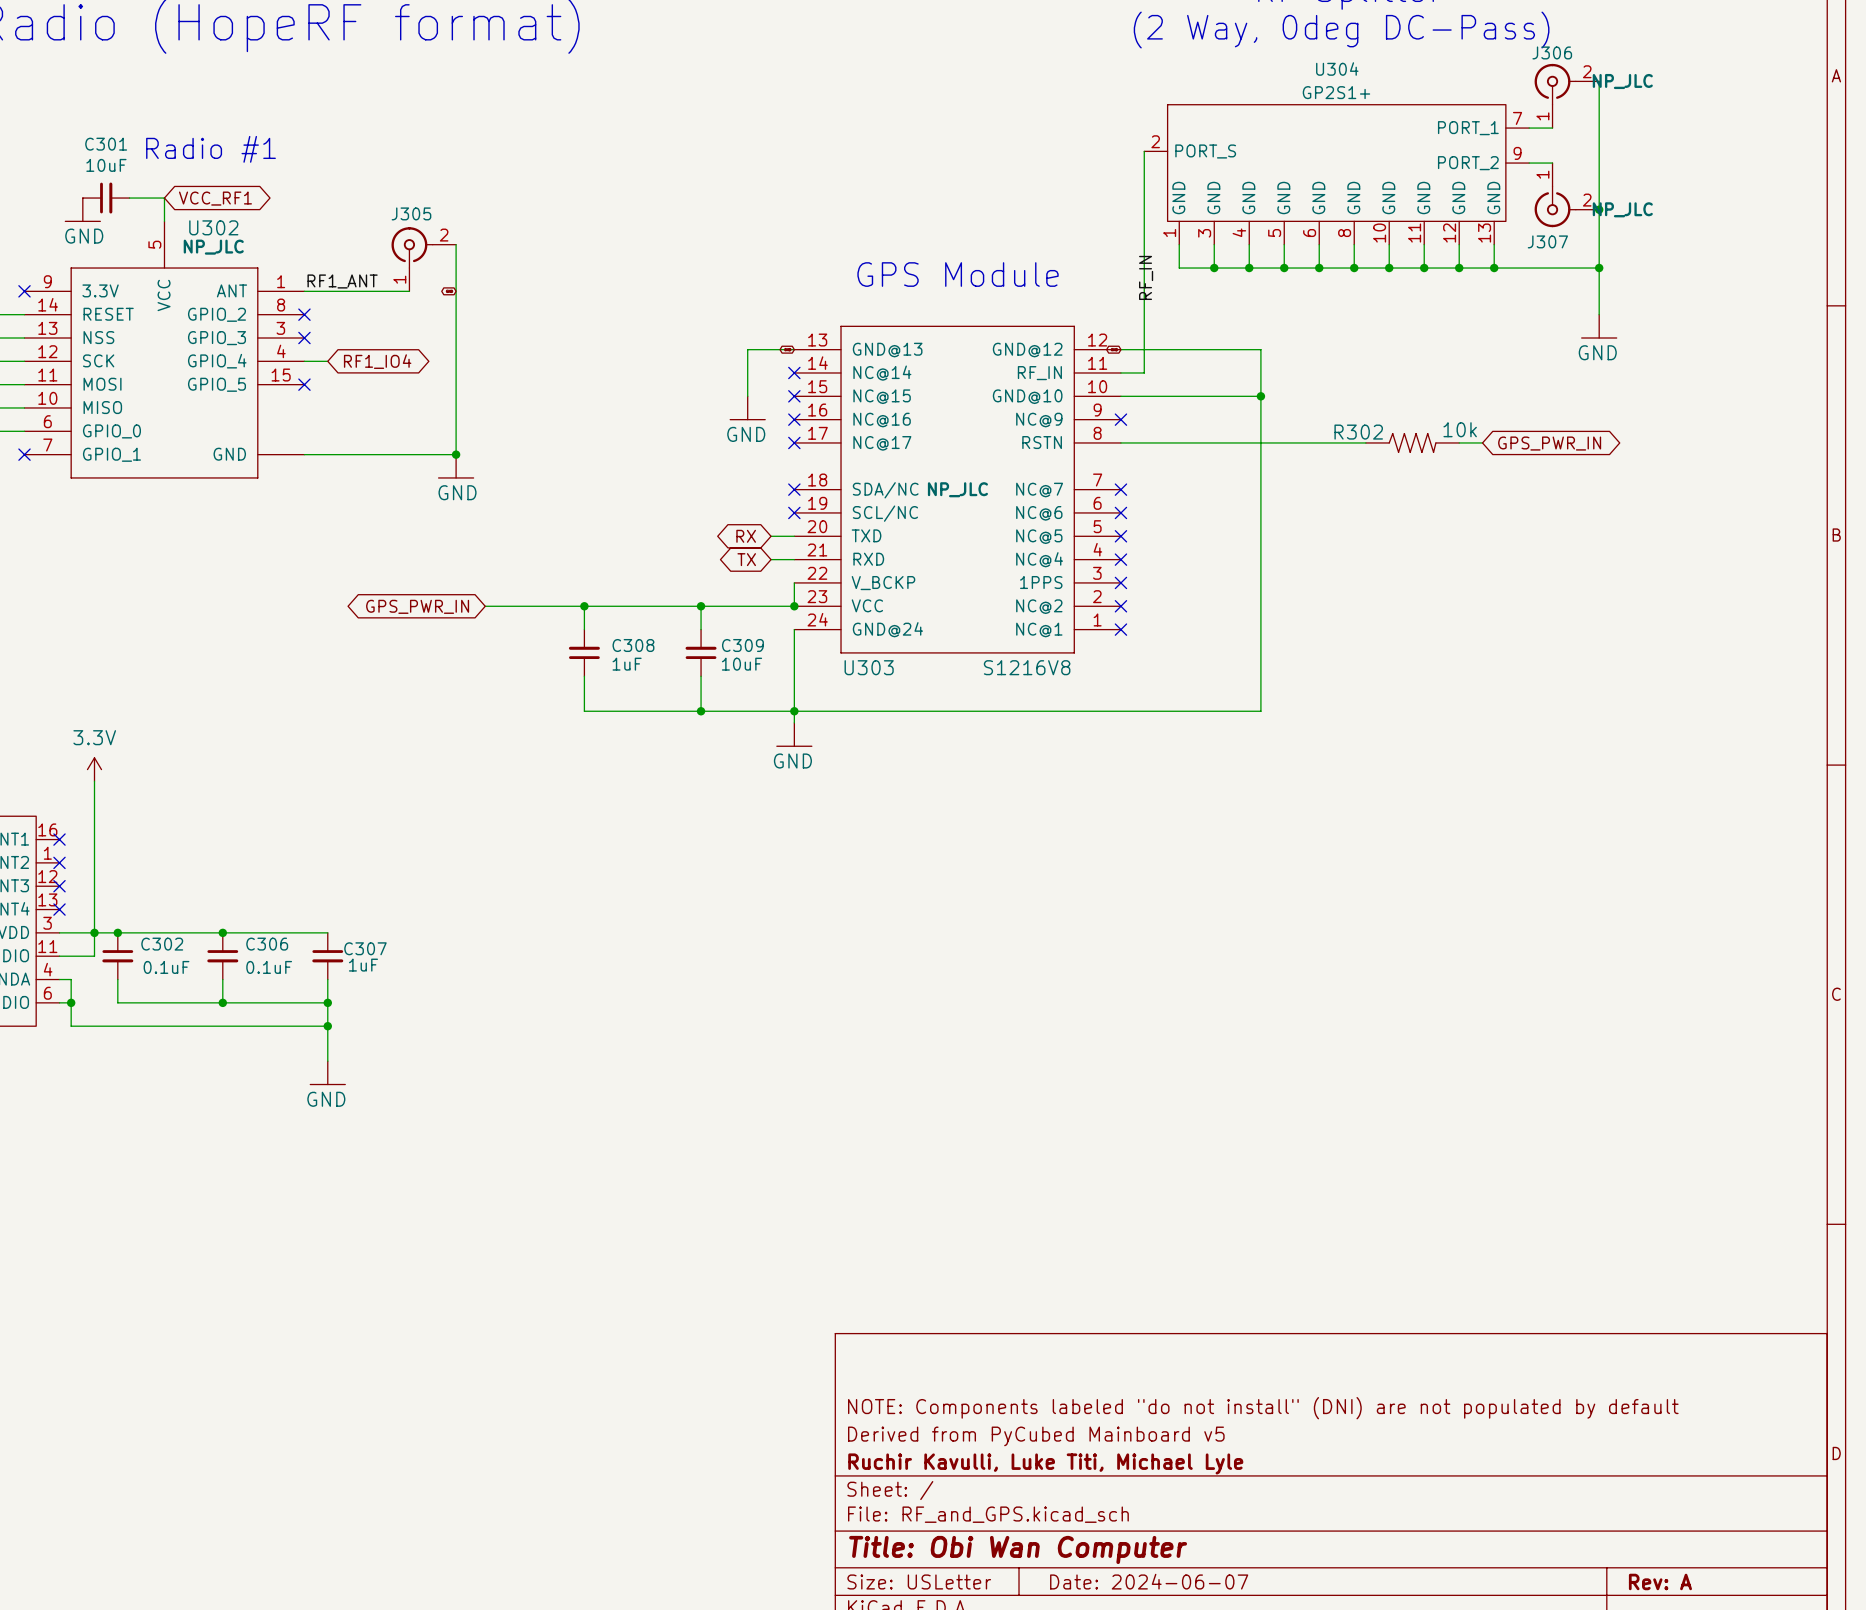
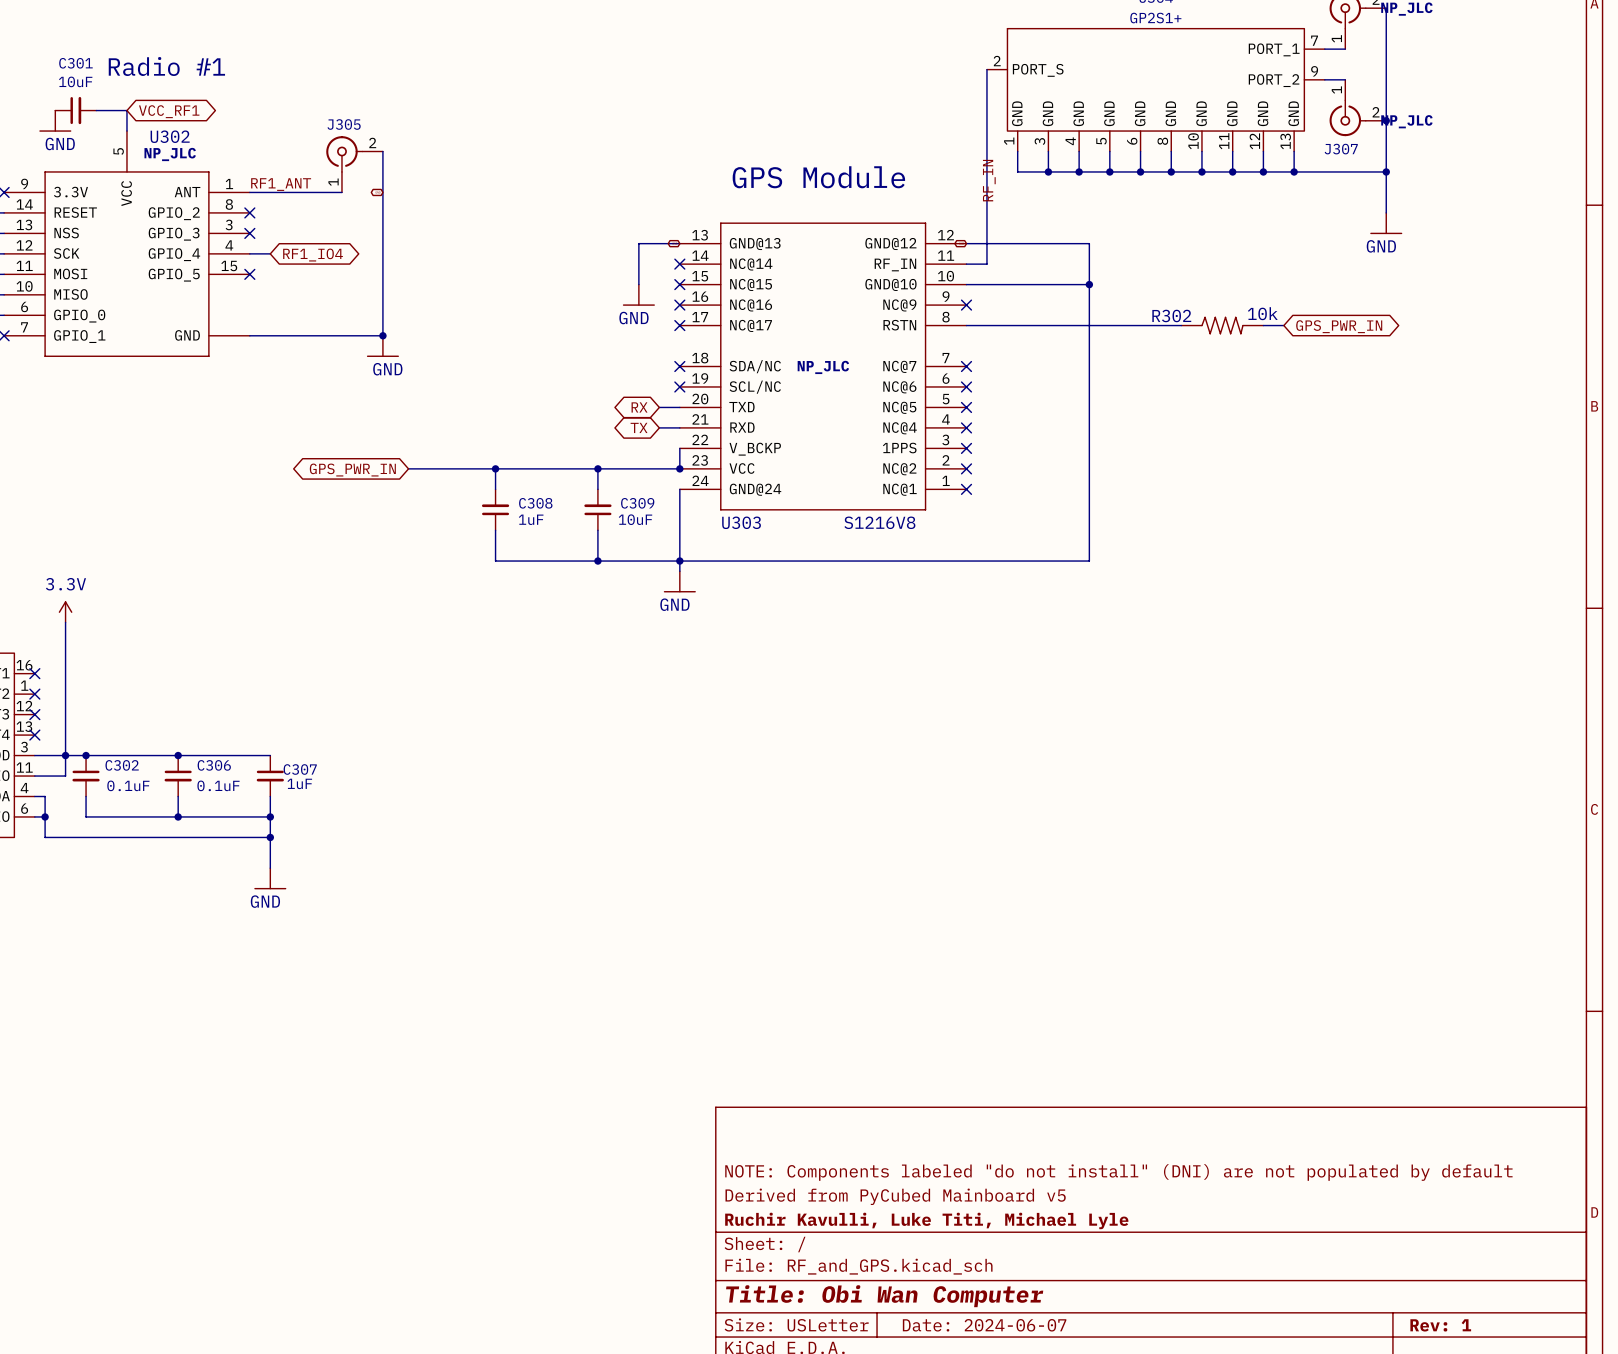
title block: Rev: A (1660, 1581) -> Rev: 1 (1440, 1325)

